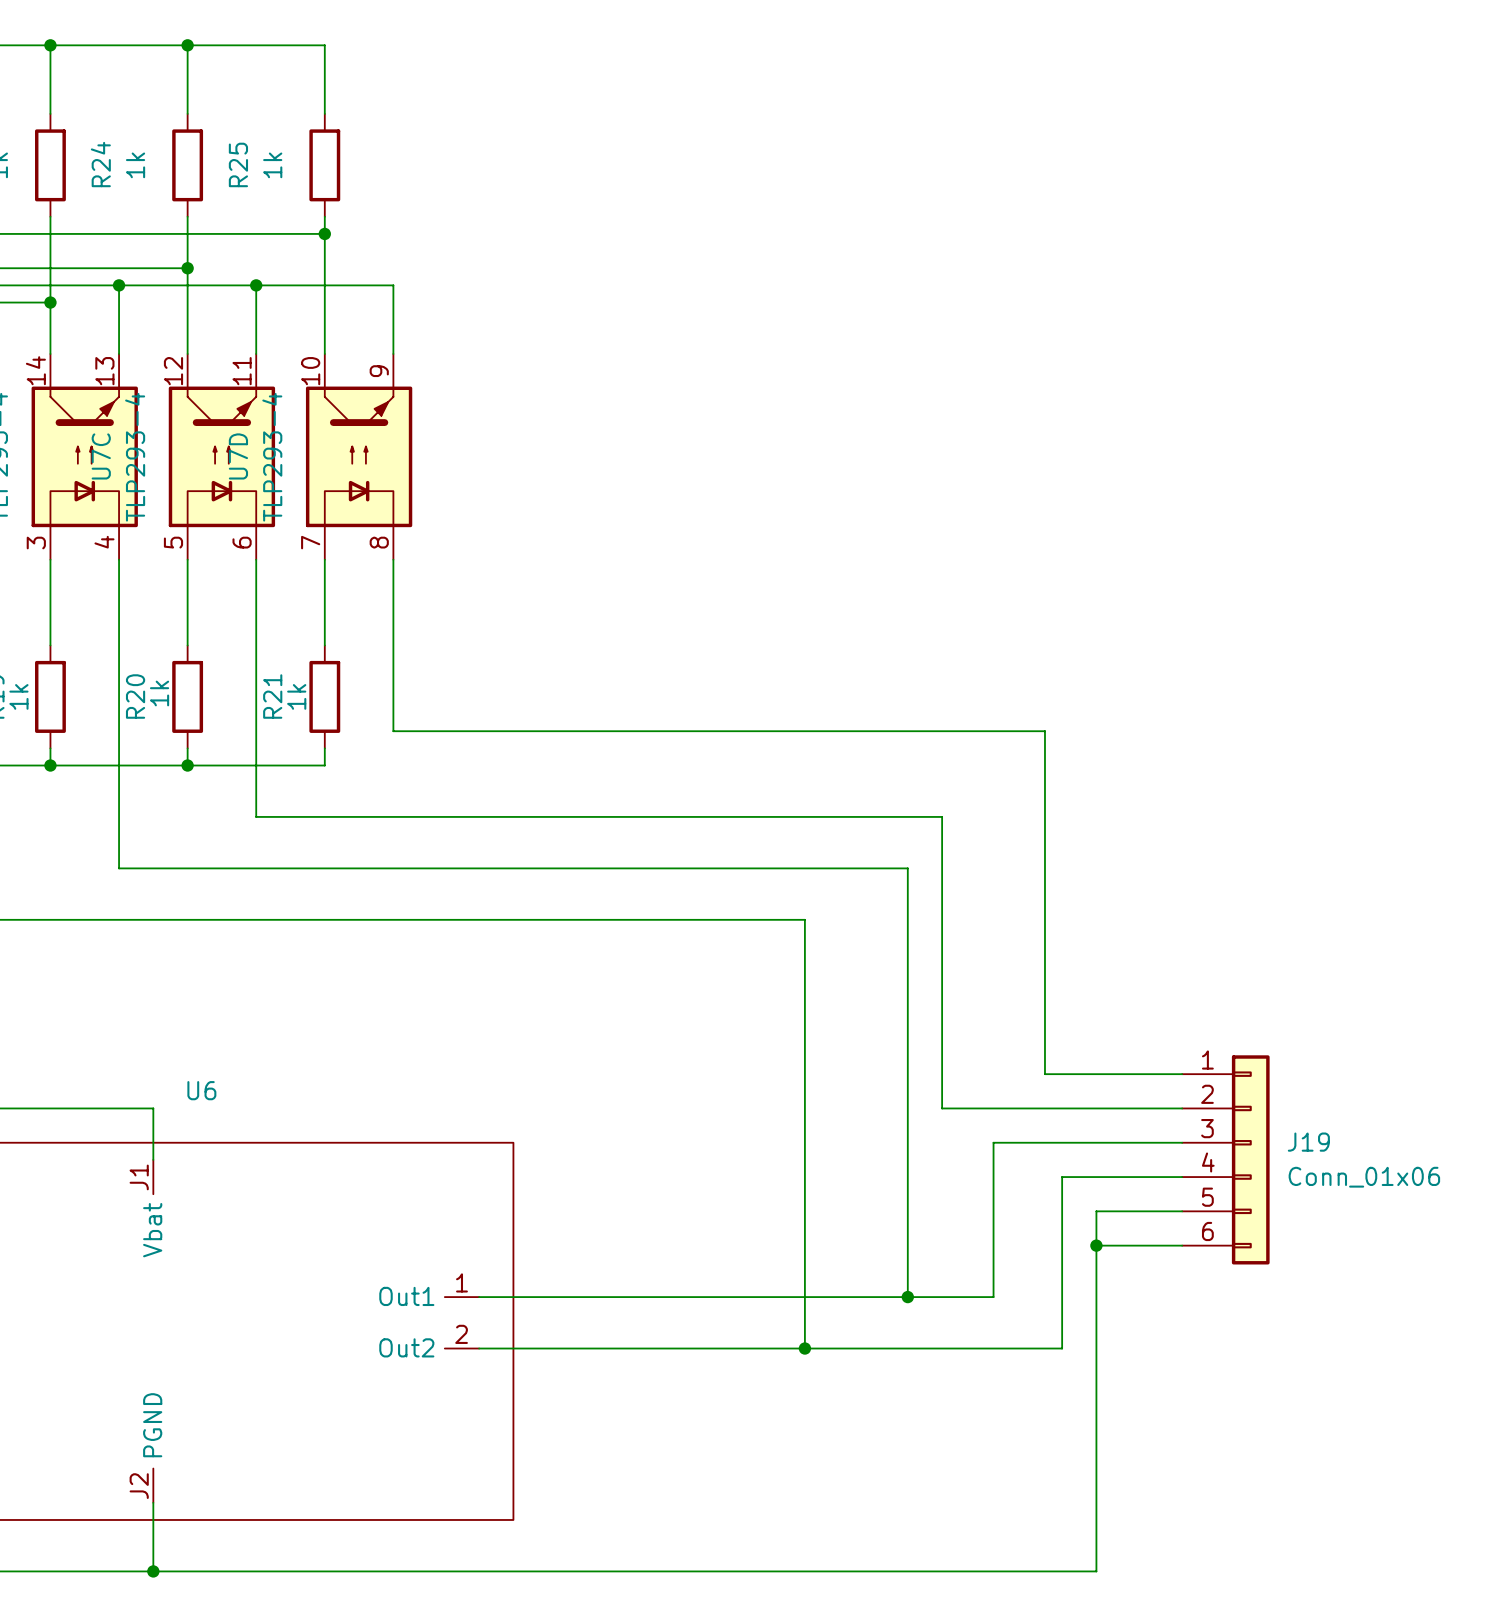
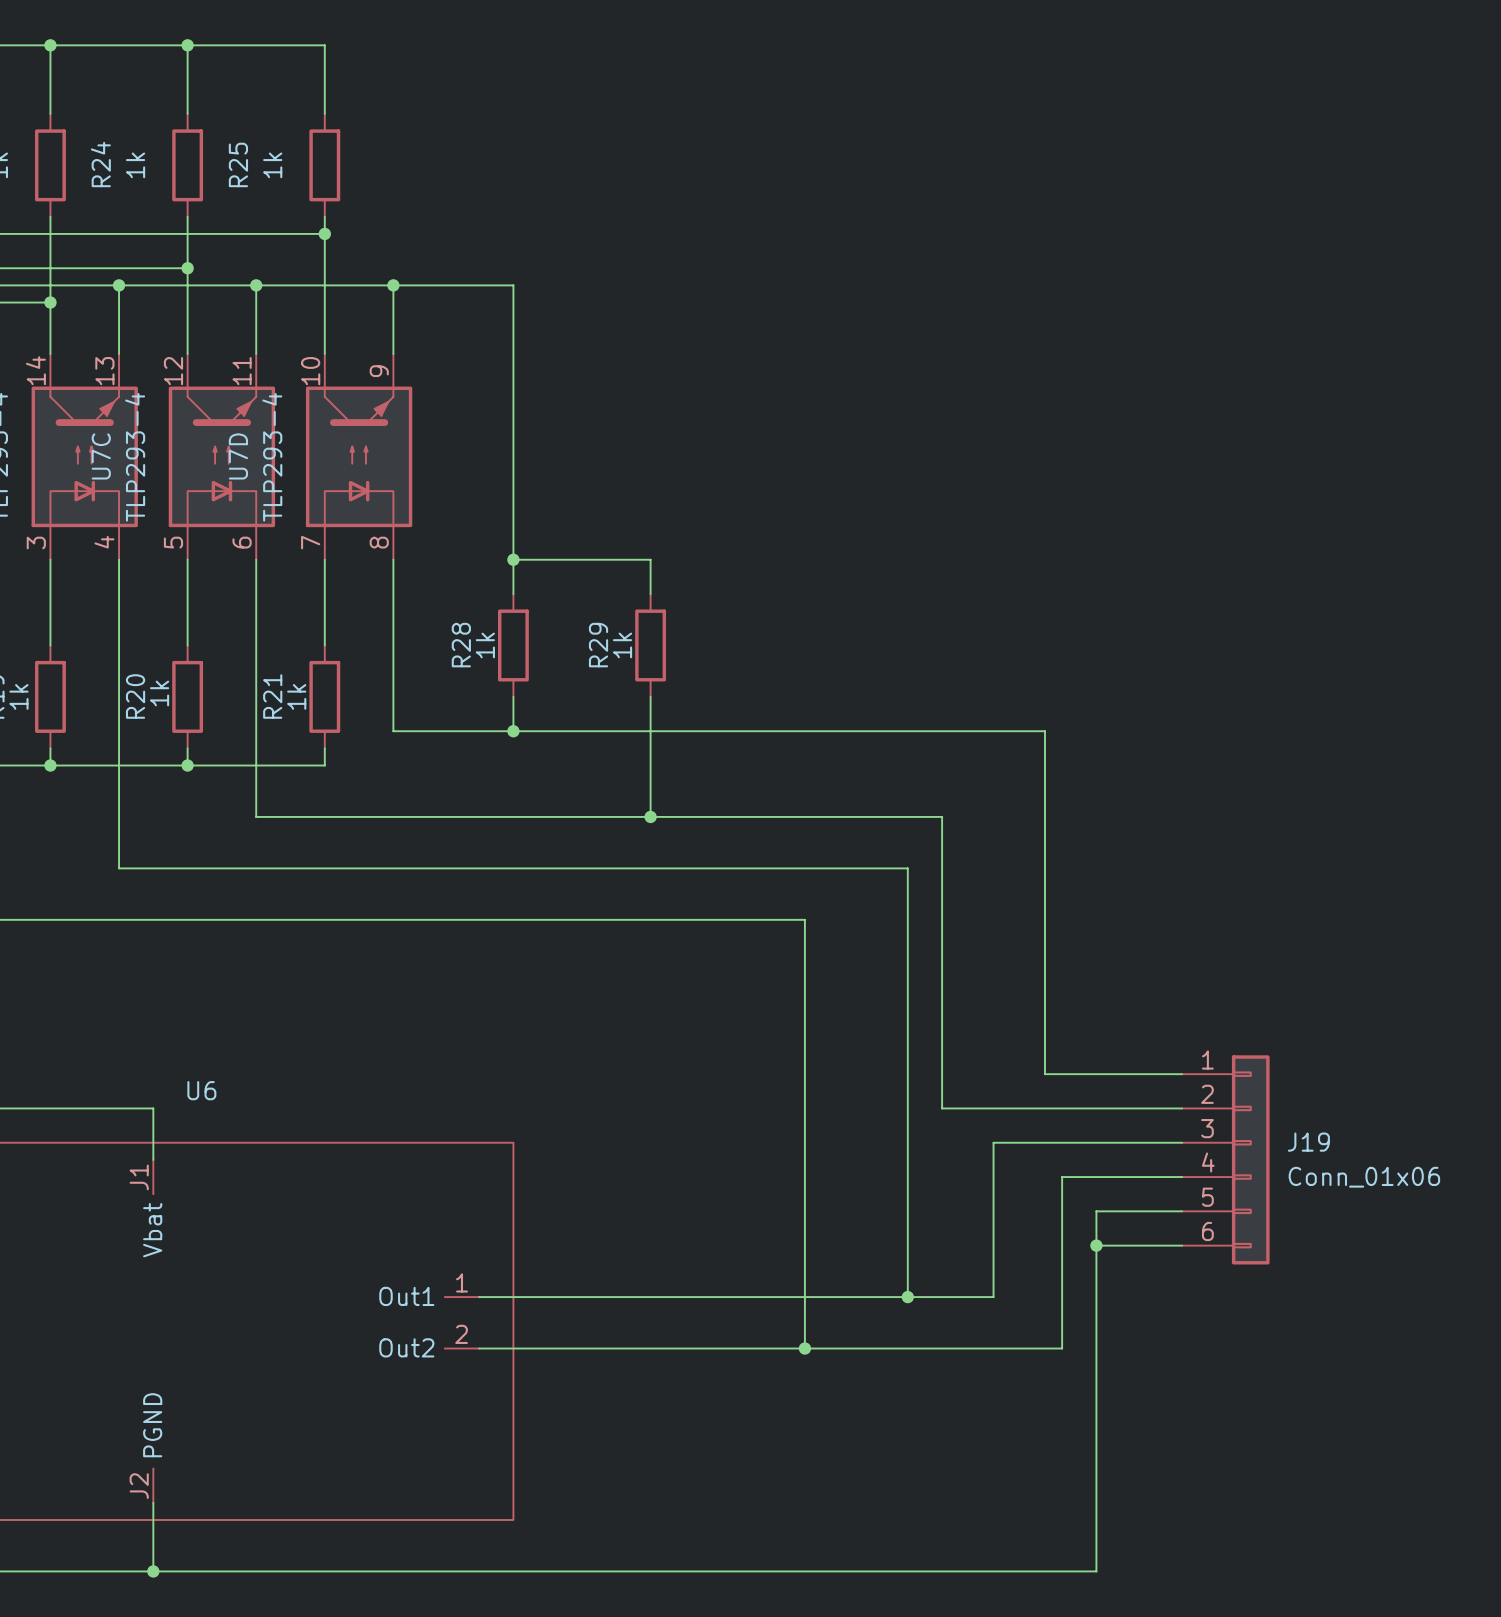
wire: none -> (393, 285) (513, 285) (513, 594)
junction: none -> (393, 285)
wire: none -> (513, 559) (650, 559) (650, 594)
junction: none -> (513, 559)
R28: none -> 1k (513, 645)
R29: none -> 1k (650, 645)
wire: none -> (513, 696) (513, 731)
wire: none -> (650, 696) (650, 816)
junction: none -> (513, 731)
junction: none -> (650, 816)

